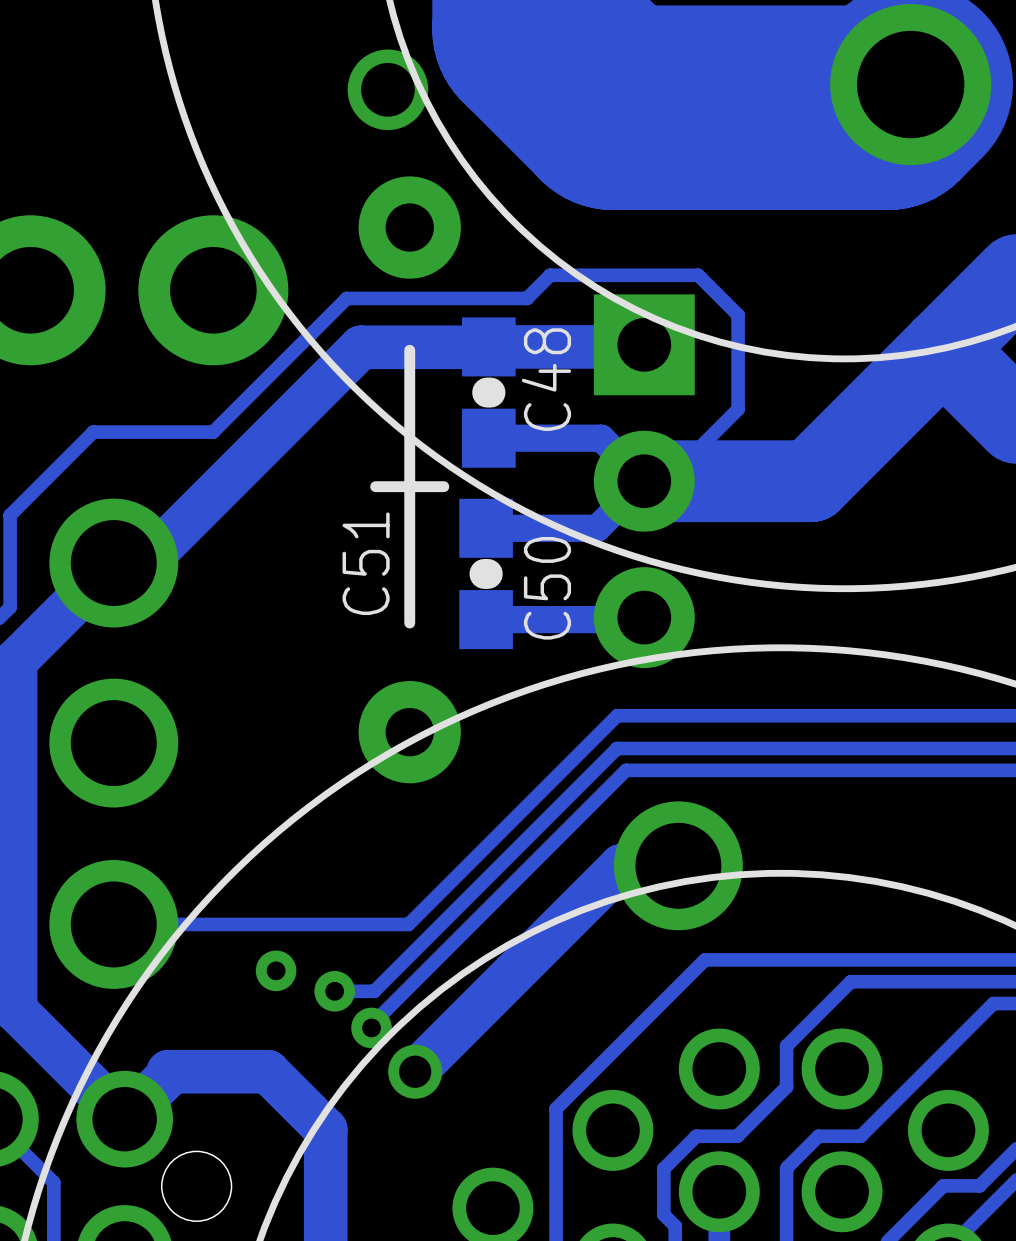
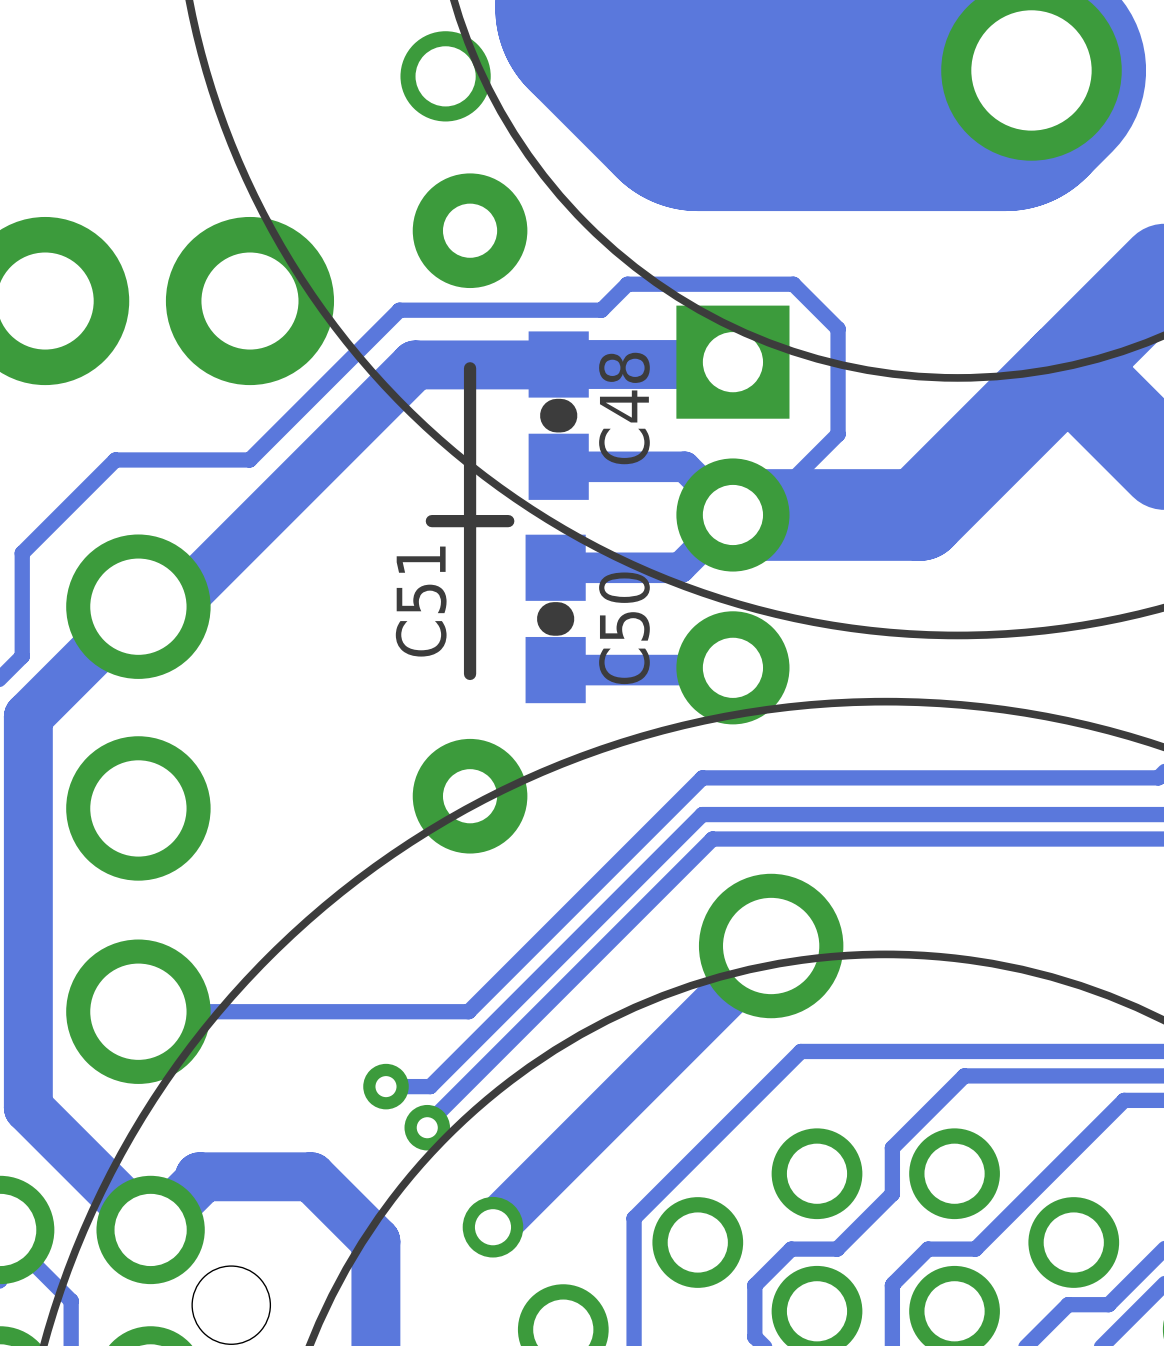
track: (678, 865) (621, 865) (415, 1071) -> (771, 946) (771, 949) (492, 1227)
via: (276, 970) -> none
via position: (415, 1071) -> (492, 1227)

